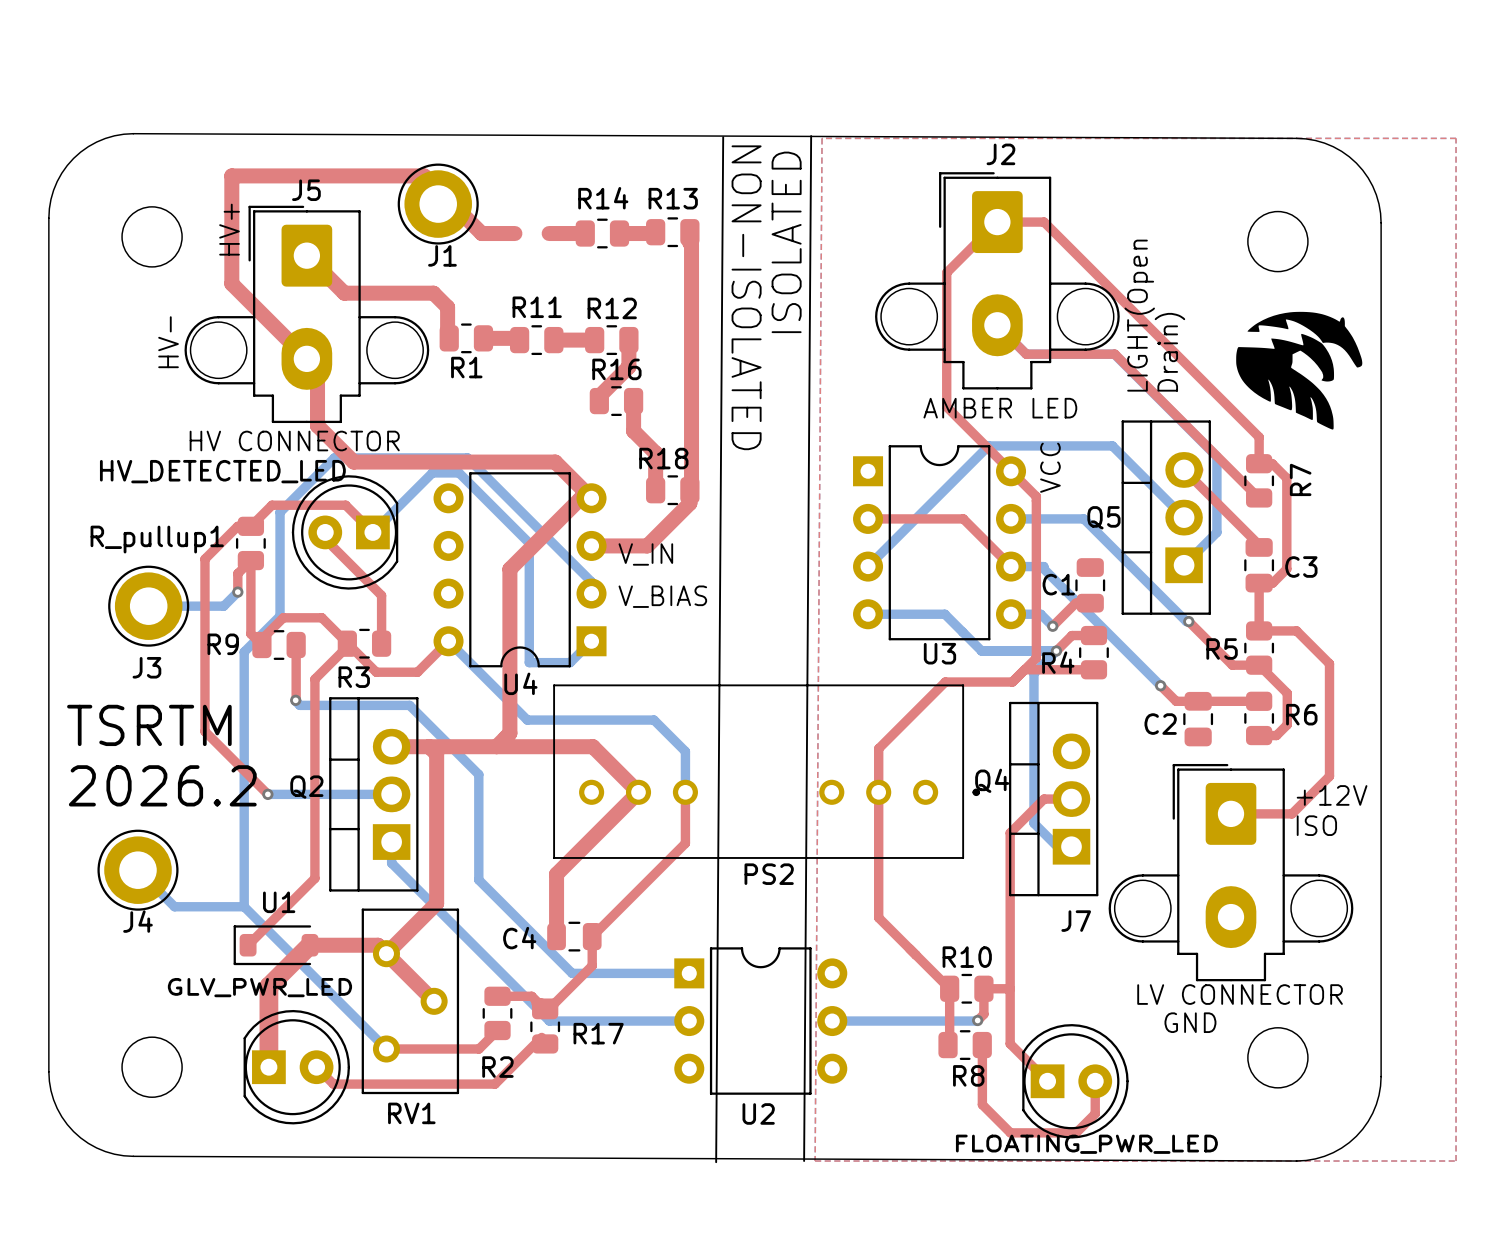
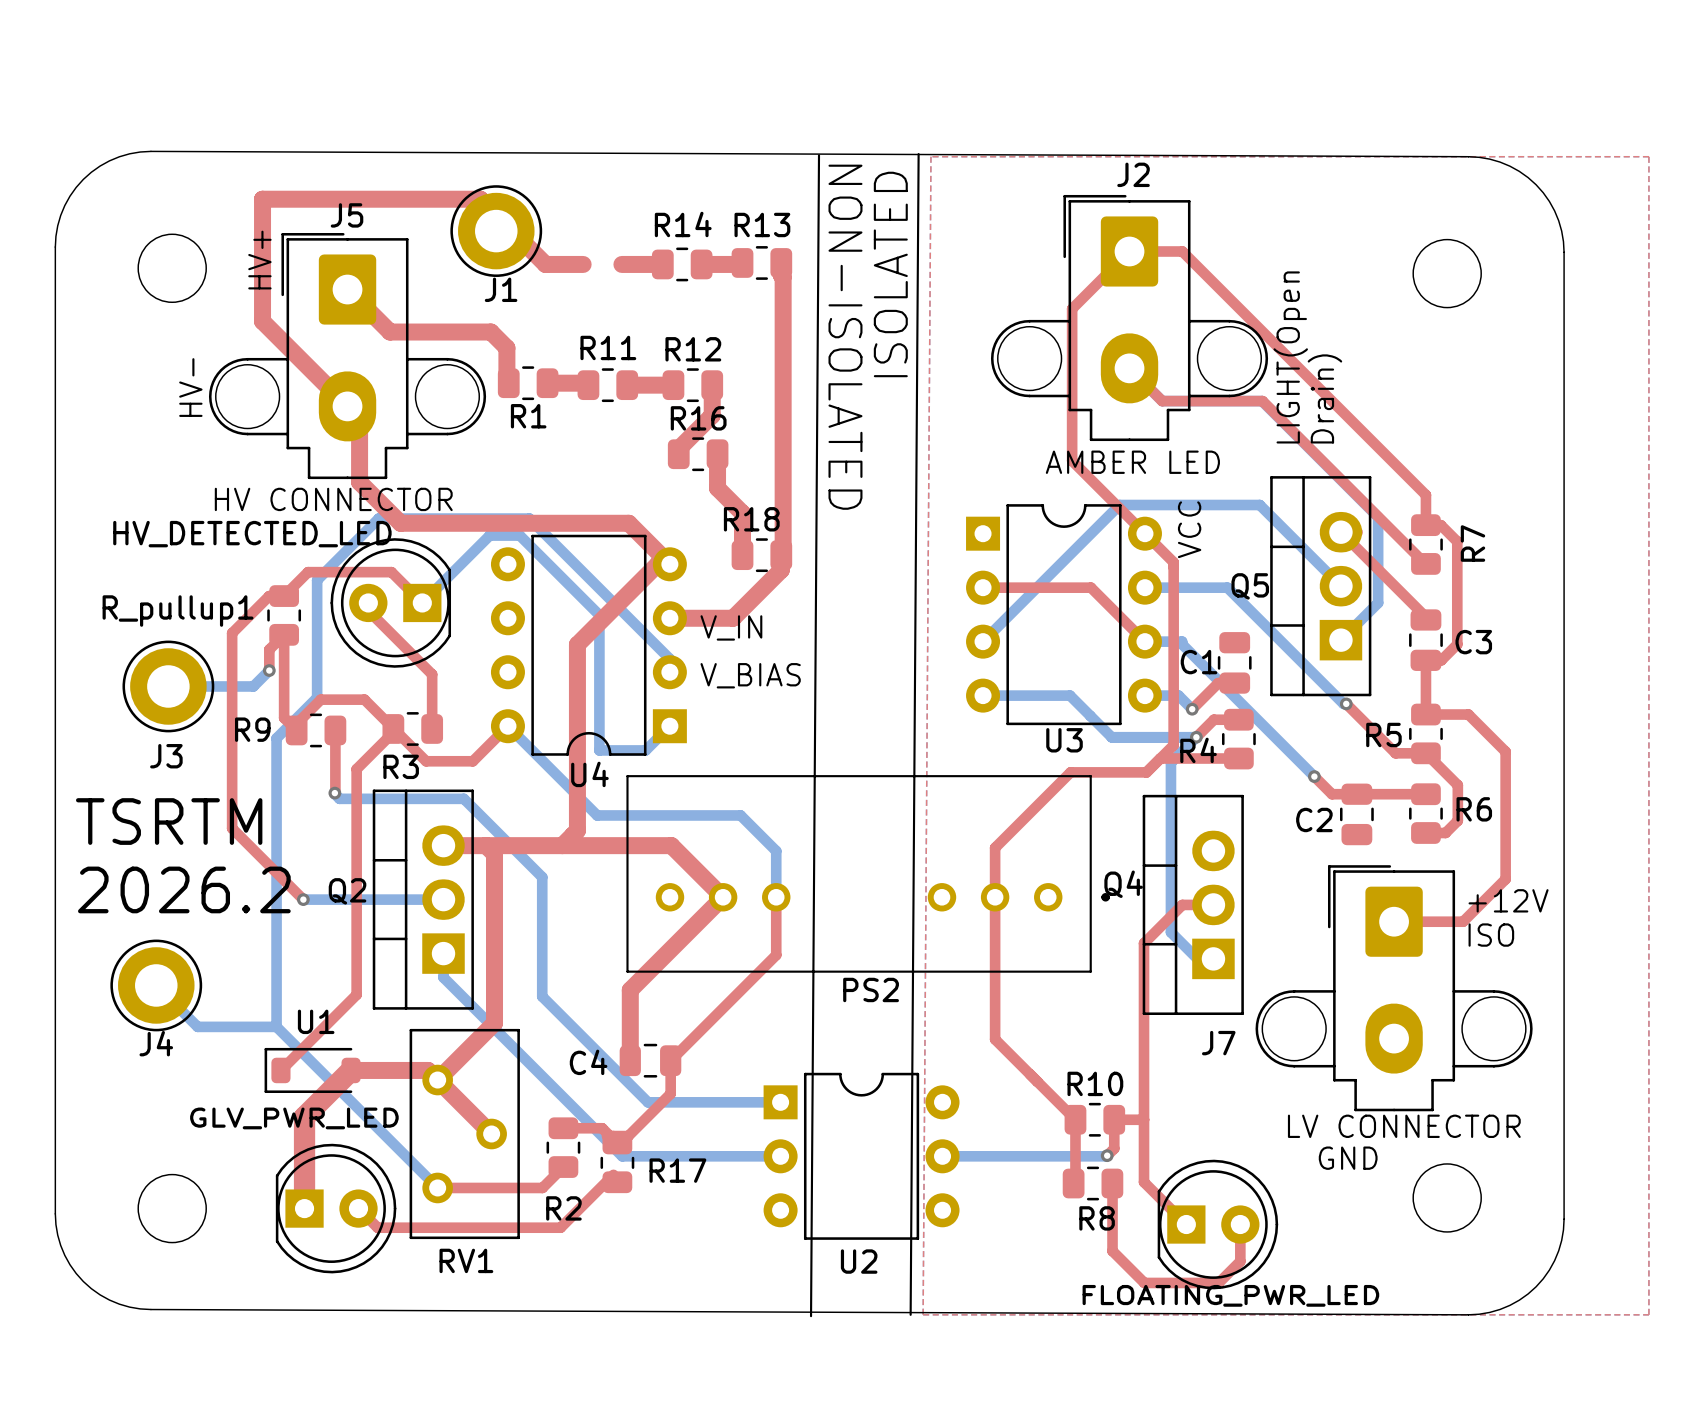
drawing: [1236, 311, 1363, 430] -> none

